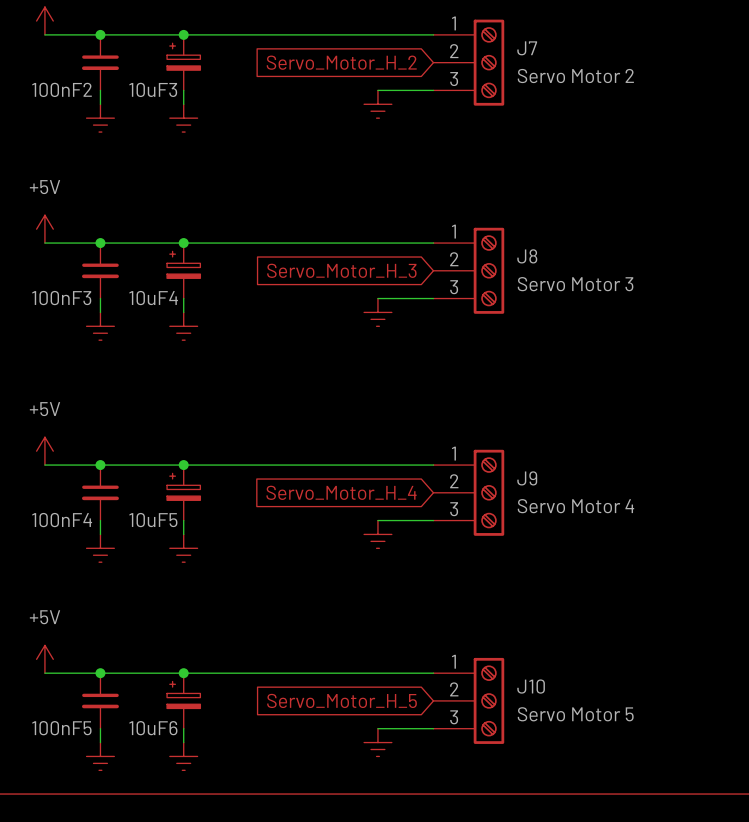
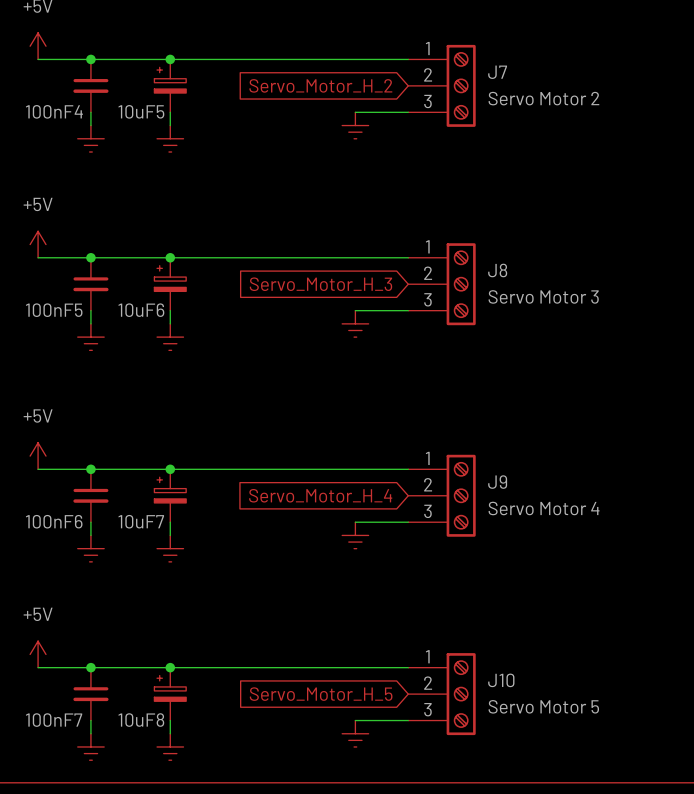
100nF2 name: 100nF2 (62, 89) -> 100nF4 (54, 111)
10uF3 name: 10uF3 (153, 89) -> 10uF5 (141, 111)
100nF3 name: 100nF3 (61, 298) -> 100nF5 (54, 310)
10uF4 name: 10uF4 (153, 298) -> 10uF6 (141, 310)
100nF4 name: 100nF4 (62, 520) -> 100nF6 (54, 521)
10uF5 name: 10uF5 (153, 520) -> 10uF7 (141, 521)
100nF5 name: 100nF5 (61, 728) -> 100nF7 (54, 720)
10uF6 name: 10uF6 (153, 728) -> 10uF8 (141, 720)

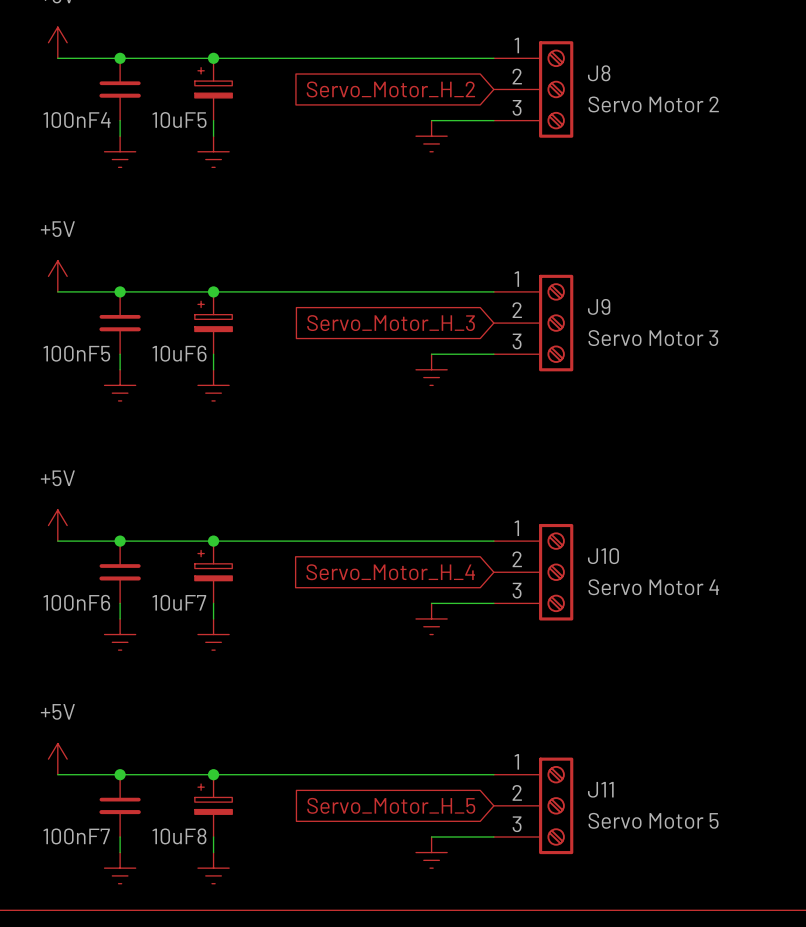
J7 name: J7 (497, 72) -> J8 (599, 73)
J8 name: J8 (497, 270) -> J9 (599, 306)
J9 name: J9 (497, 482) -> J10 (603, 556)
J10 name: J10 (501, 680) -> J11 (600, 789)

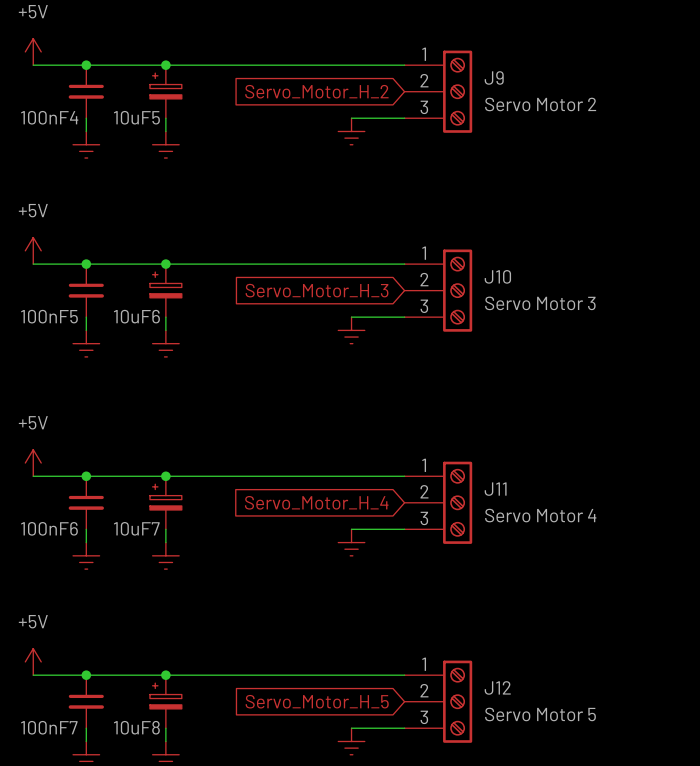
J8 name: J8 (599, 73) -> J9 (494, 77)
J9 name: J9 (599, 306) -> J10 (497, 276)
J10 name: J10 (603, 556) -> J11 (495, 489)
J11 name: J11 (600, 789) -> J12 (497, 687)

